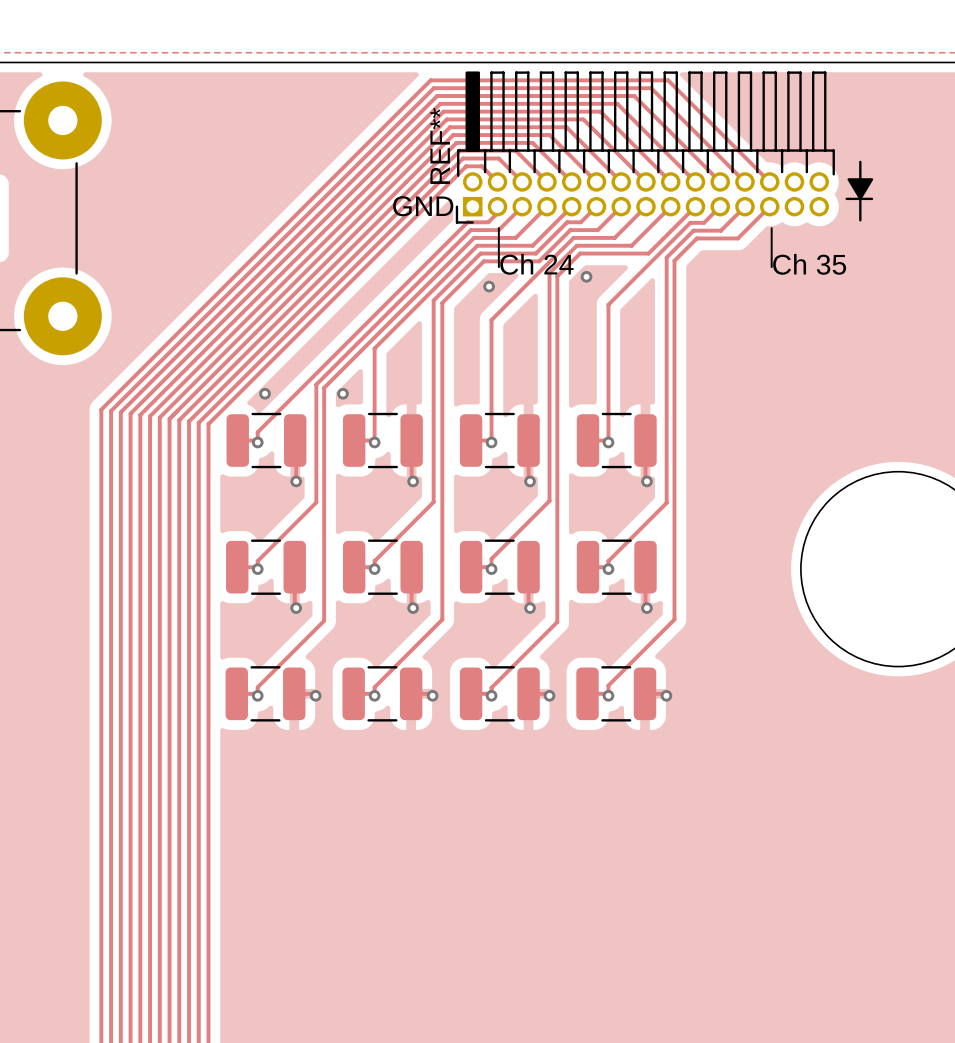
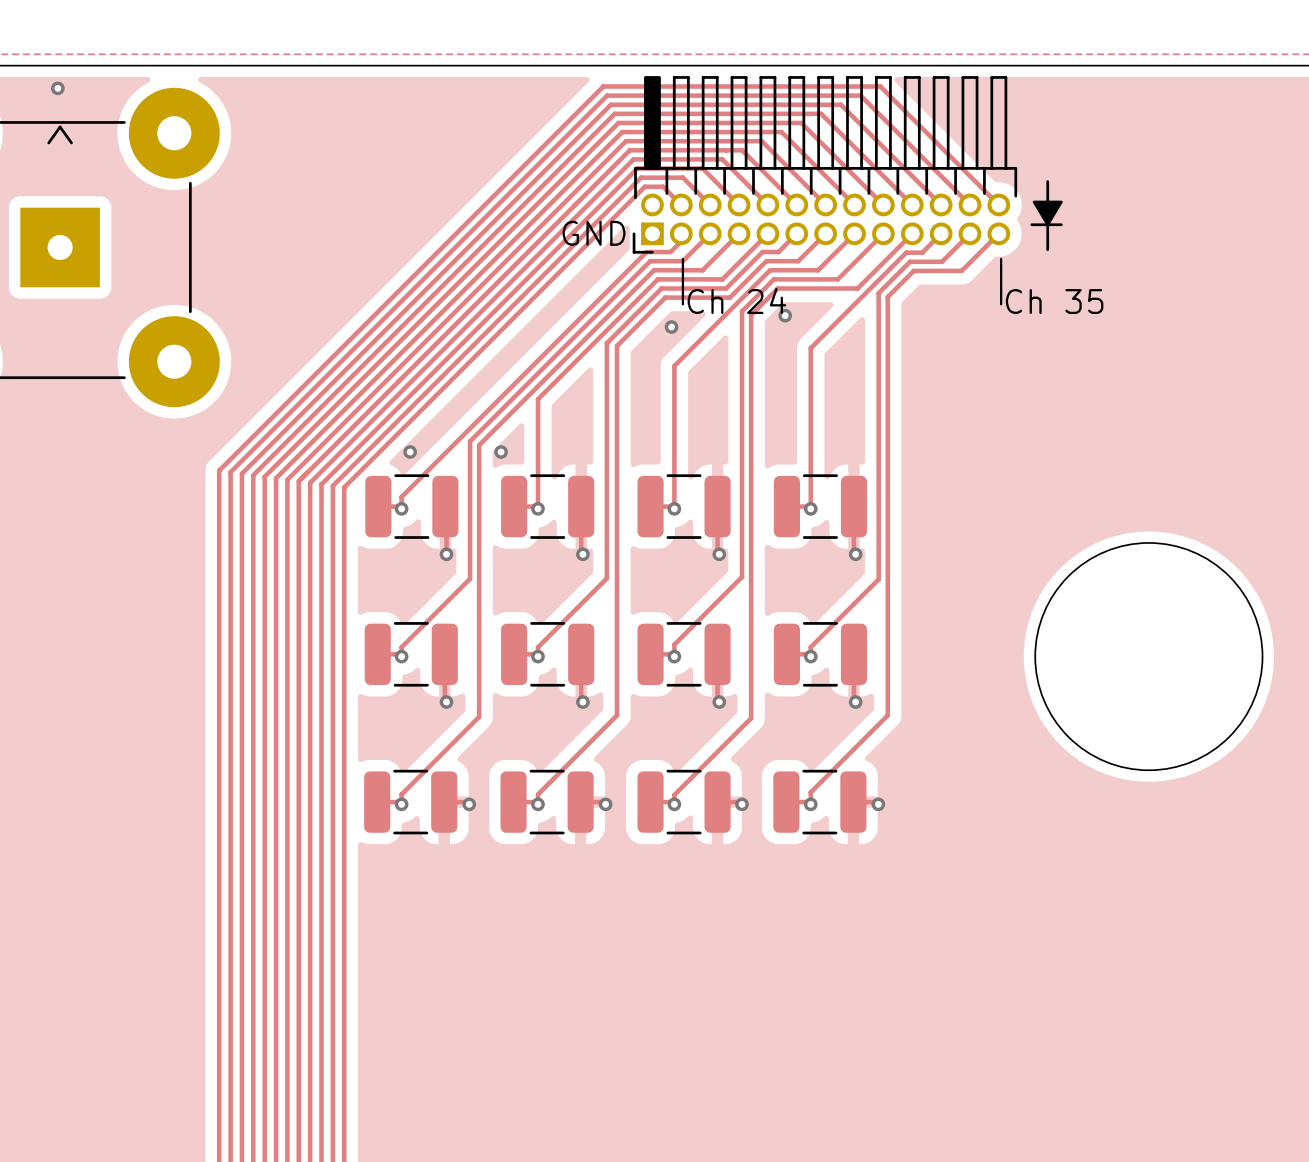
part: none -> (824, 164)
REF**: (645, 147) -> none
drawing position: (859, 191) -> (1046, 215)

